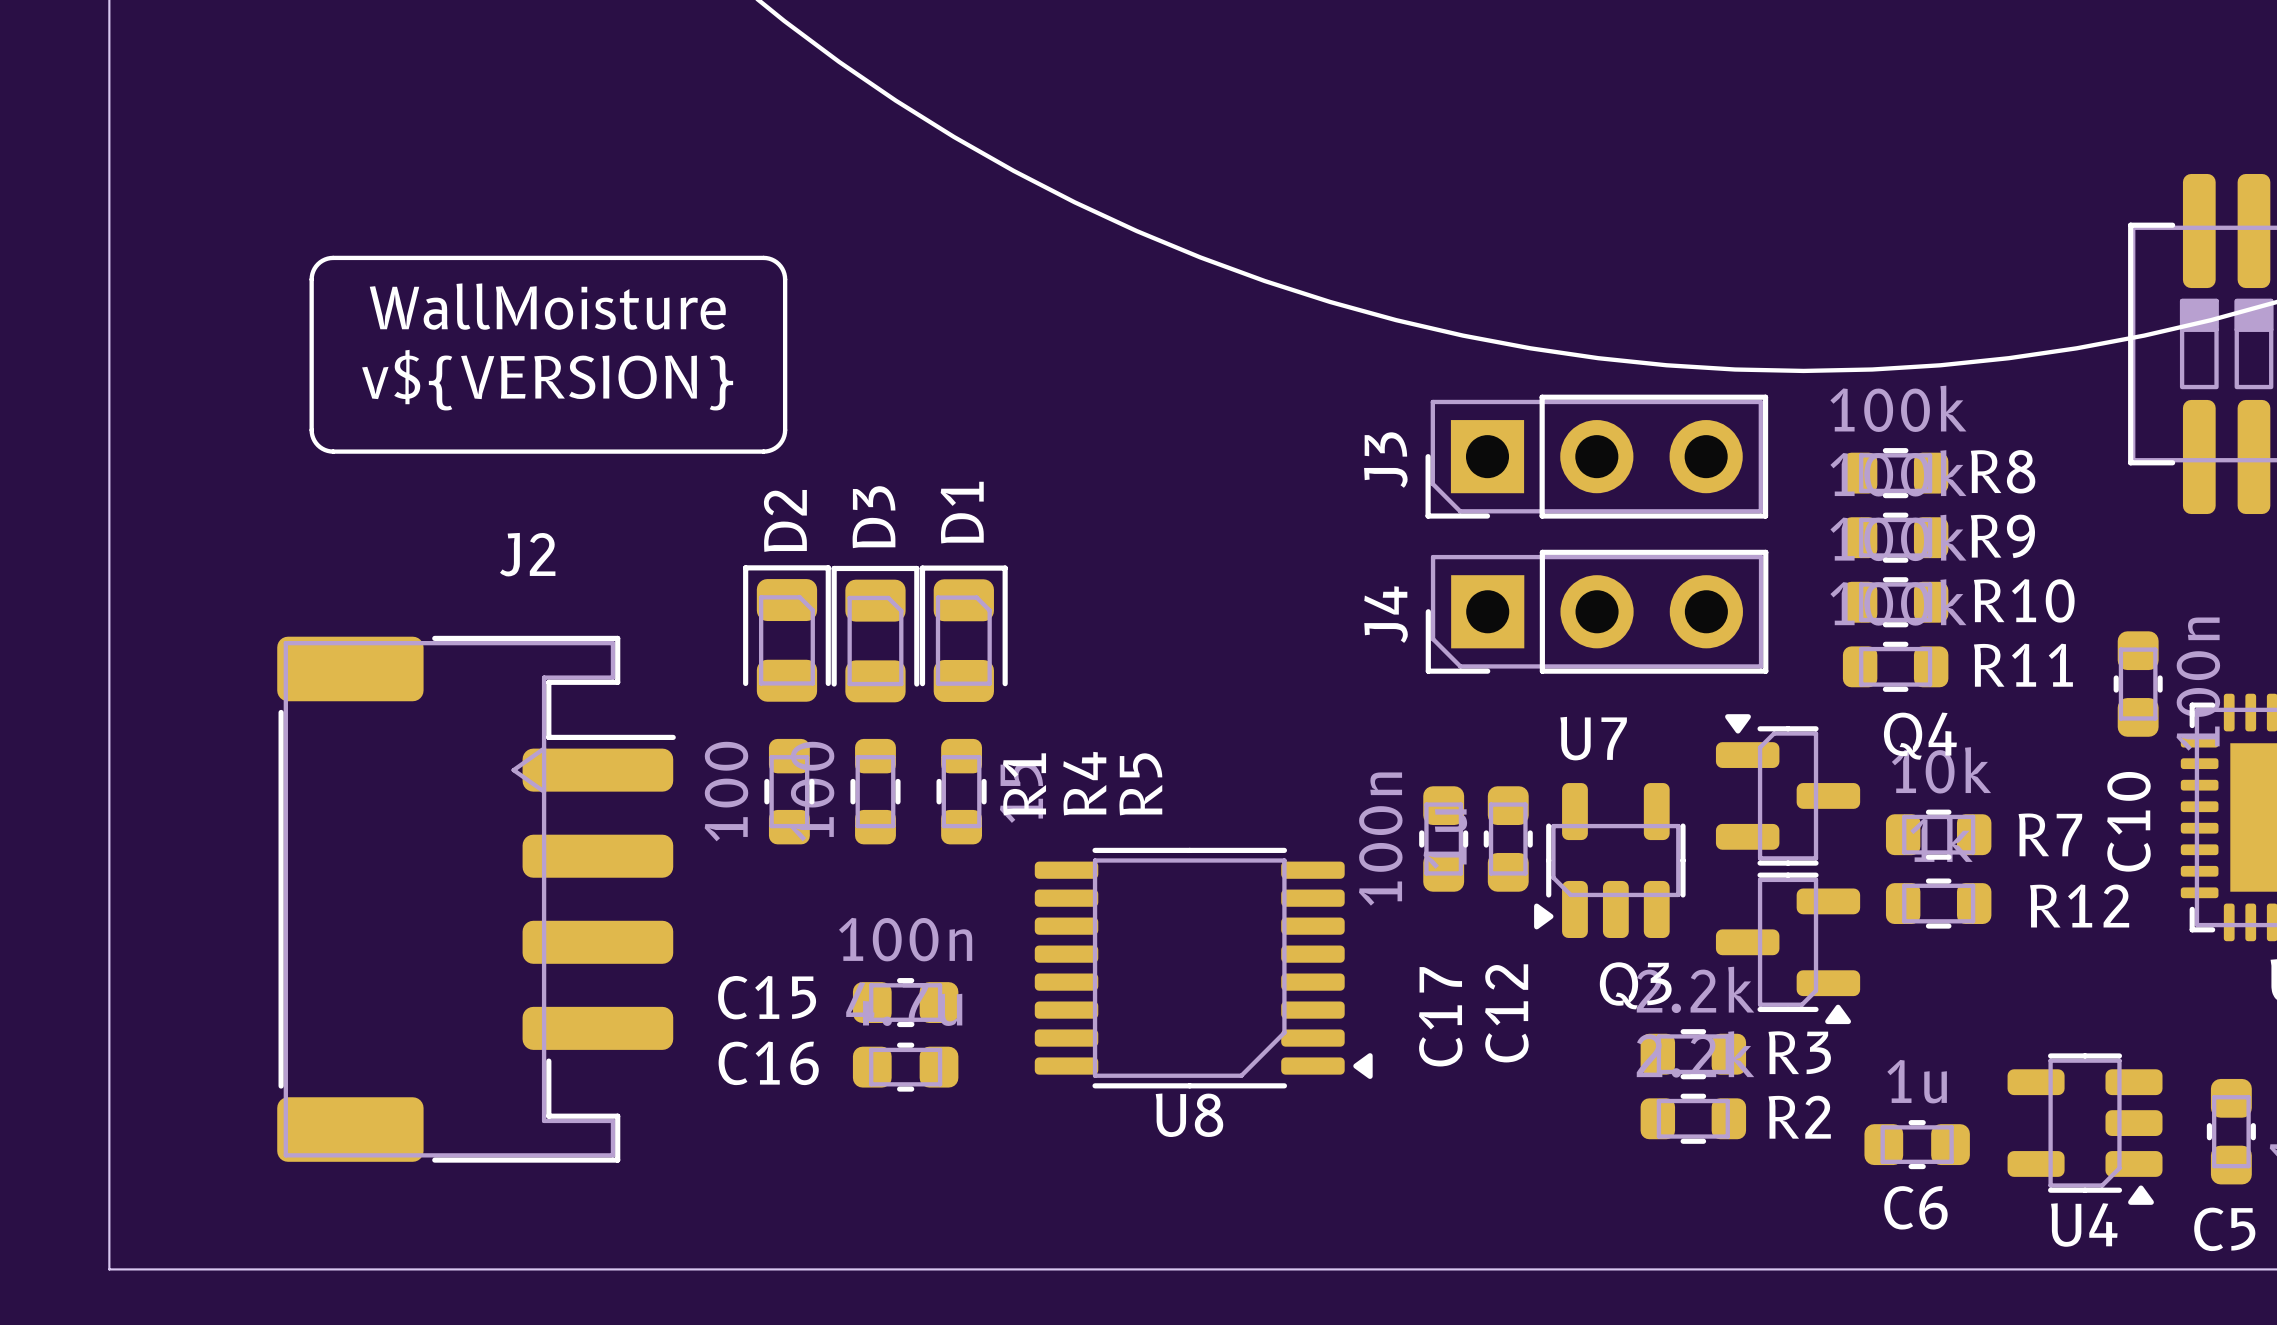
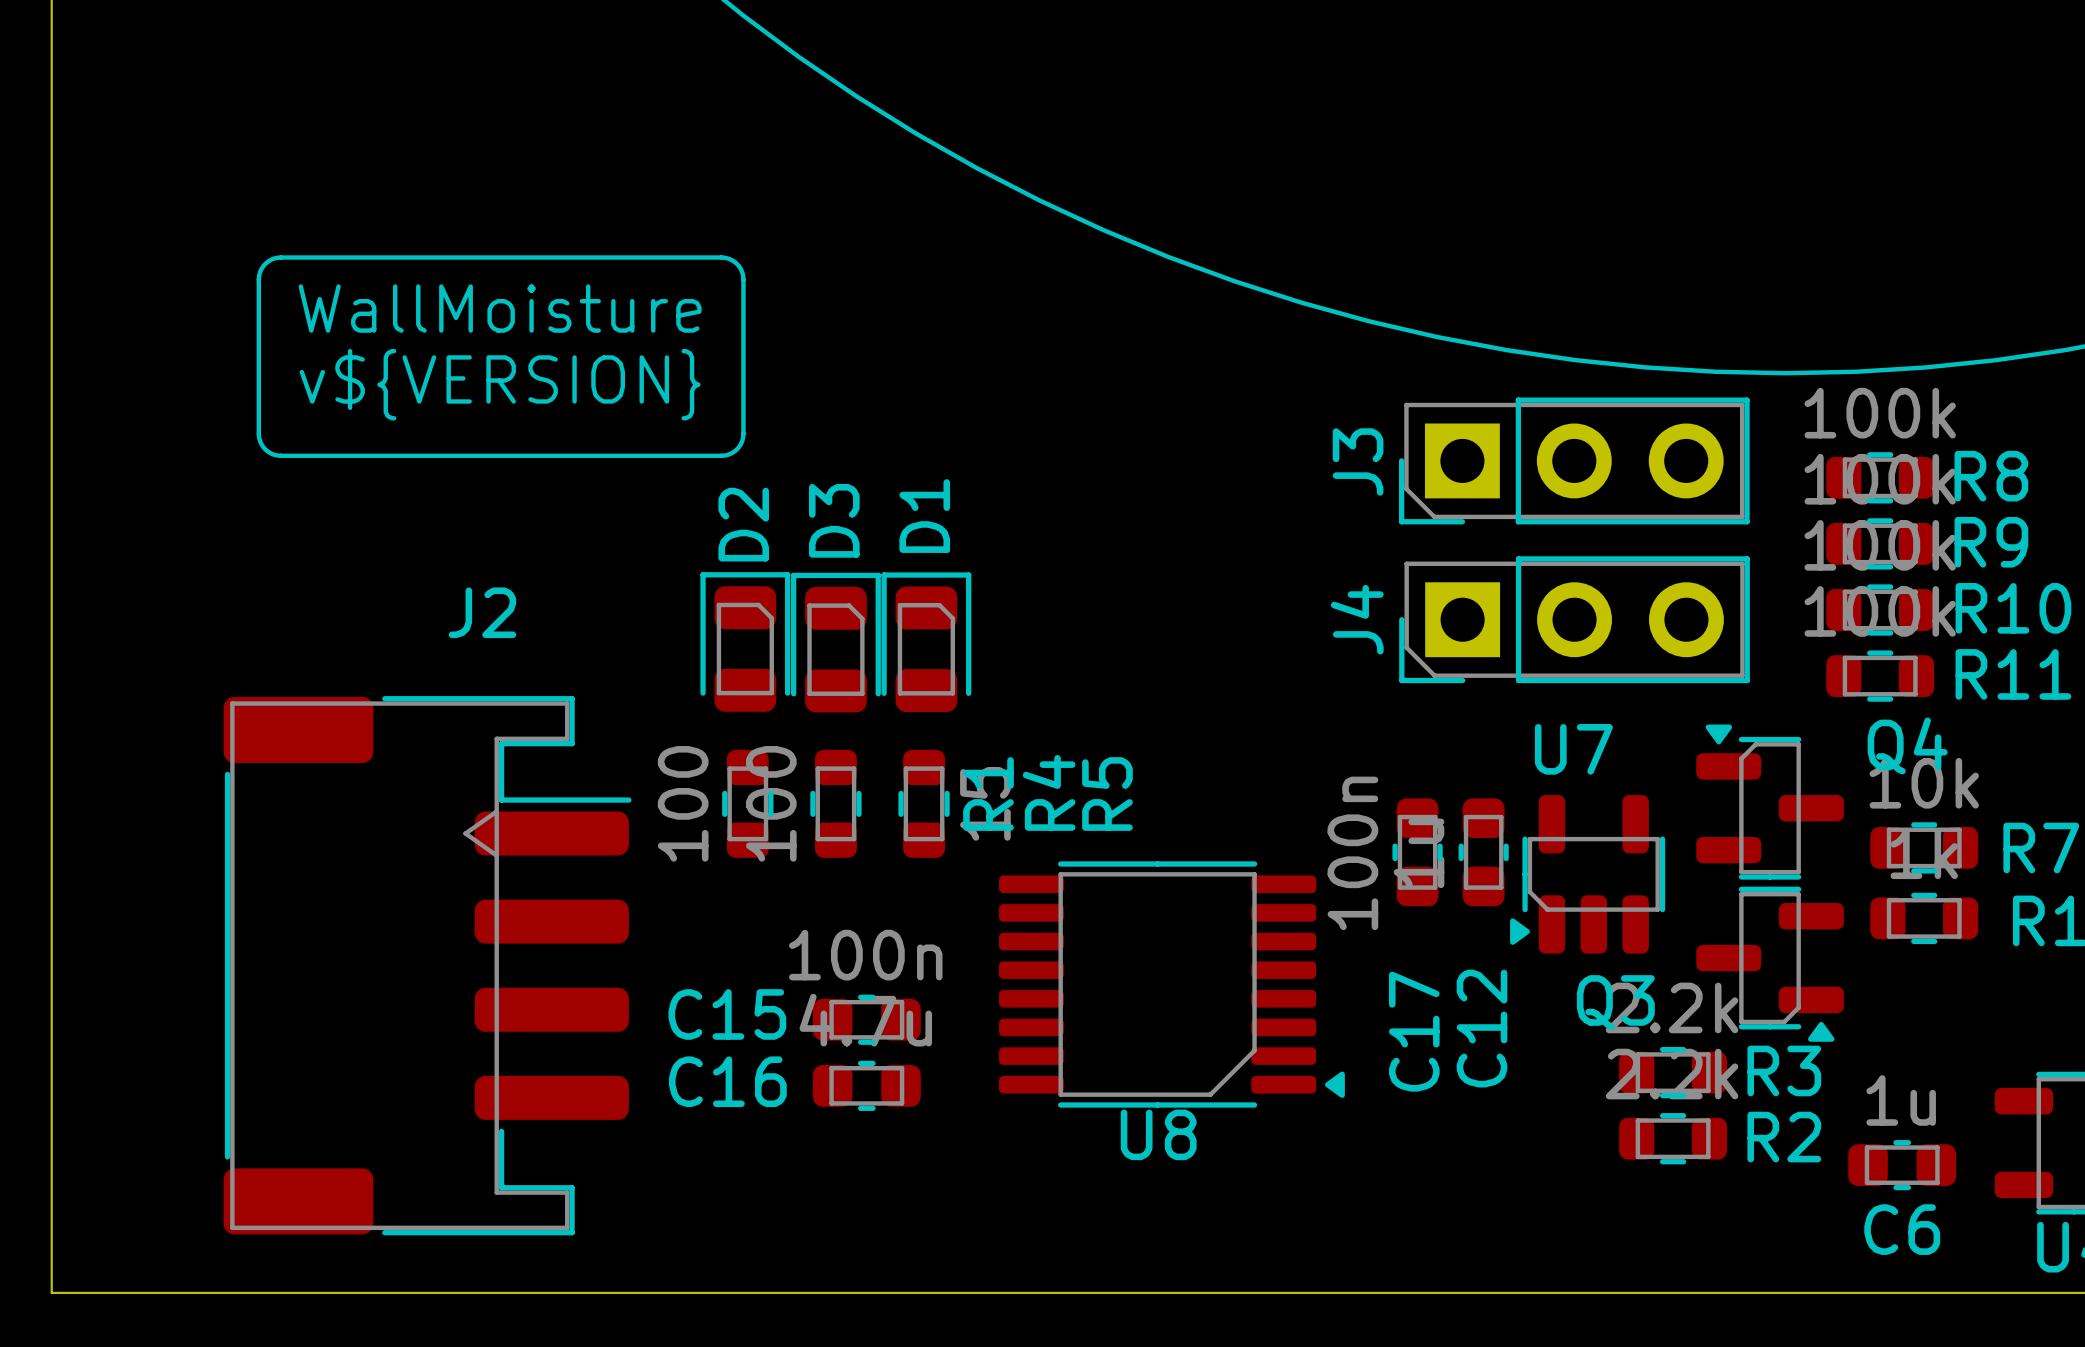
J2 position: (476, 899) -> (427, 965)

